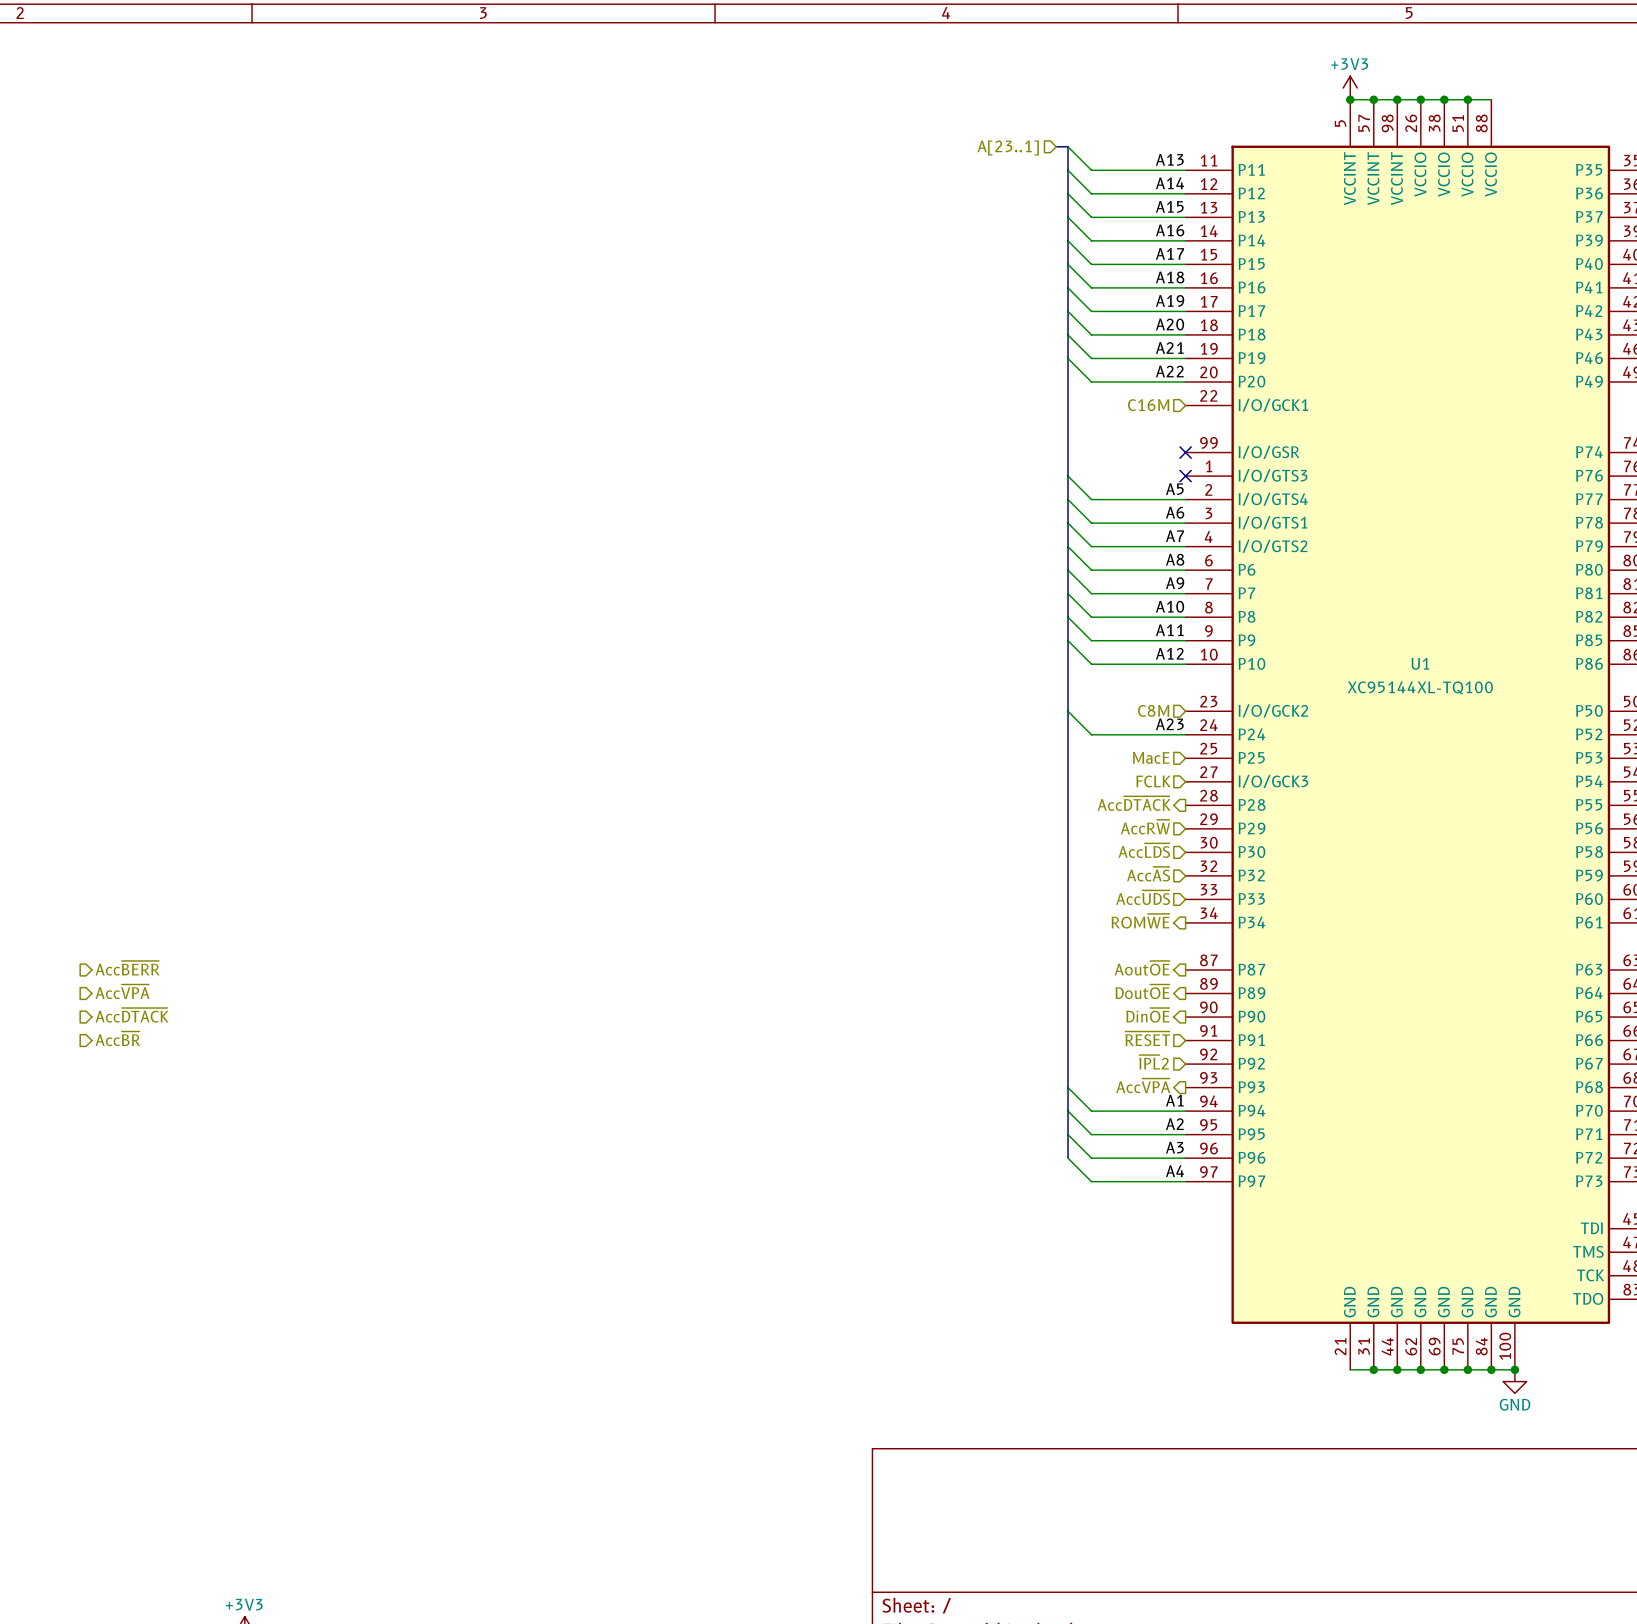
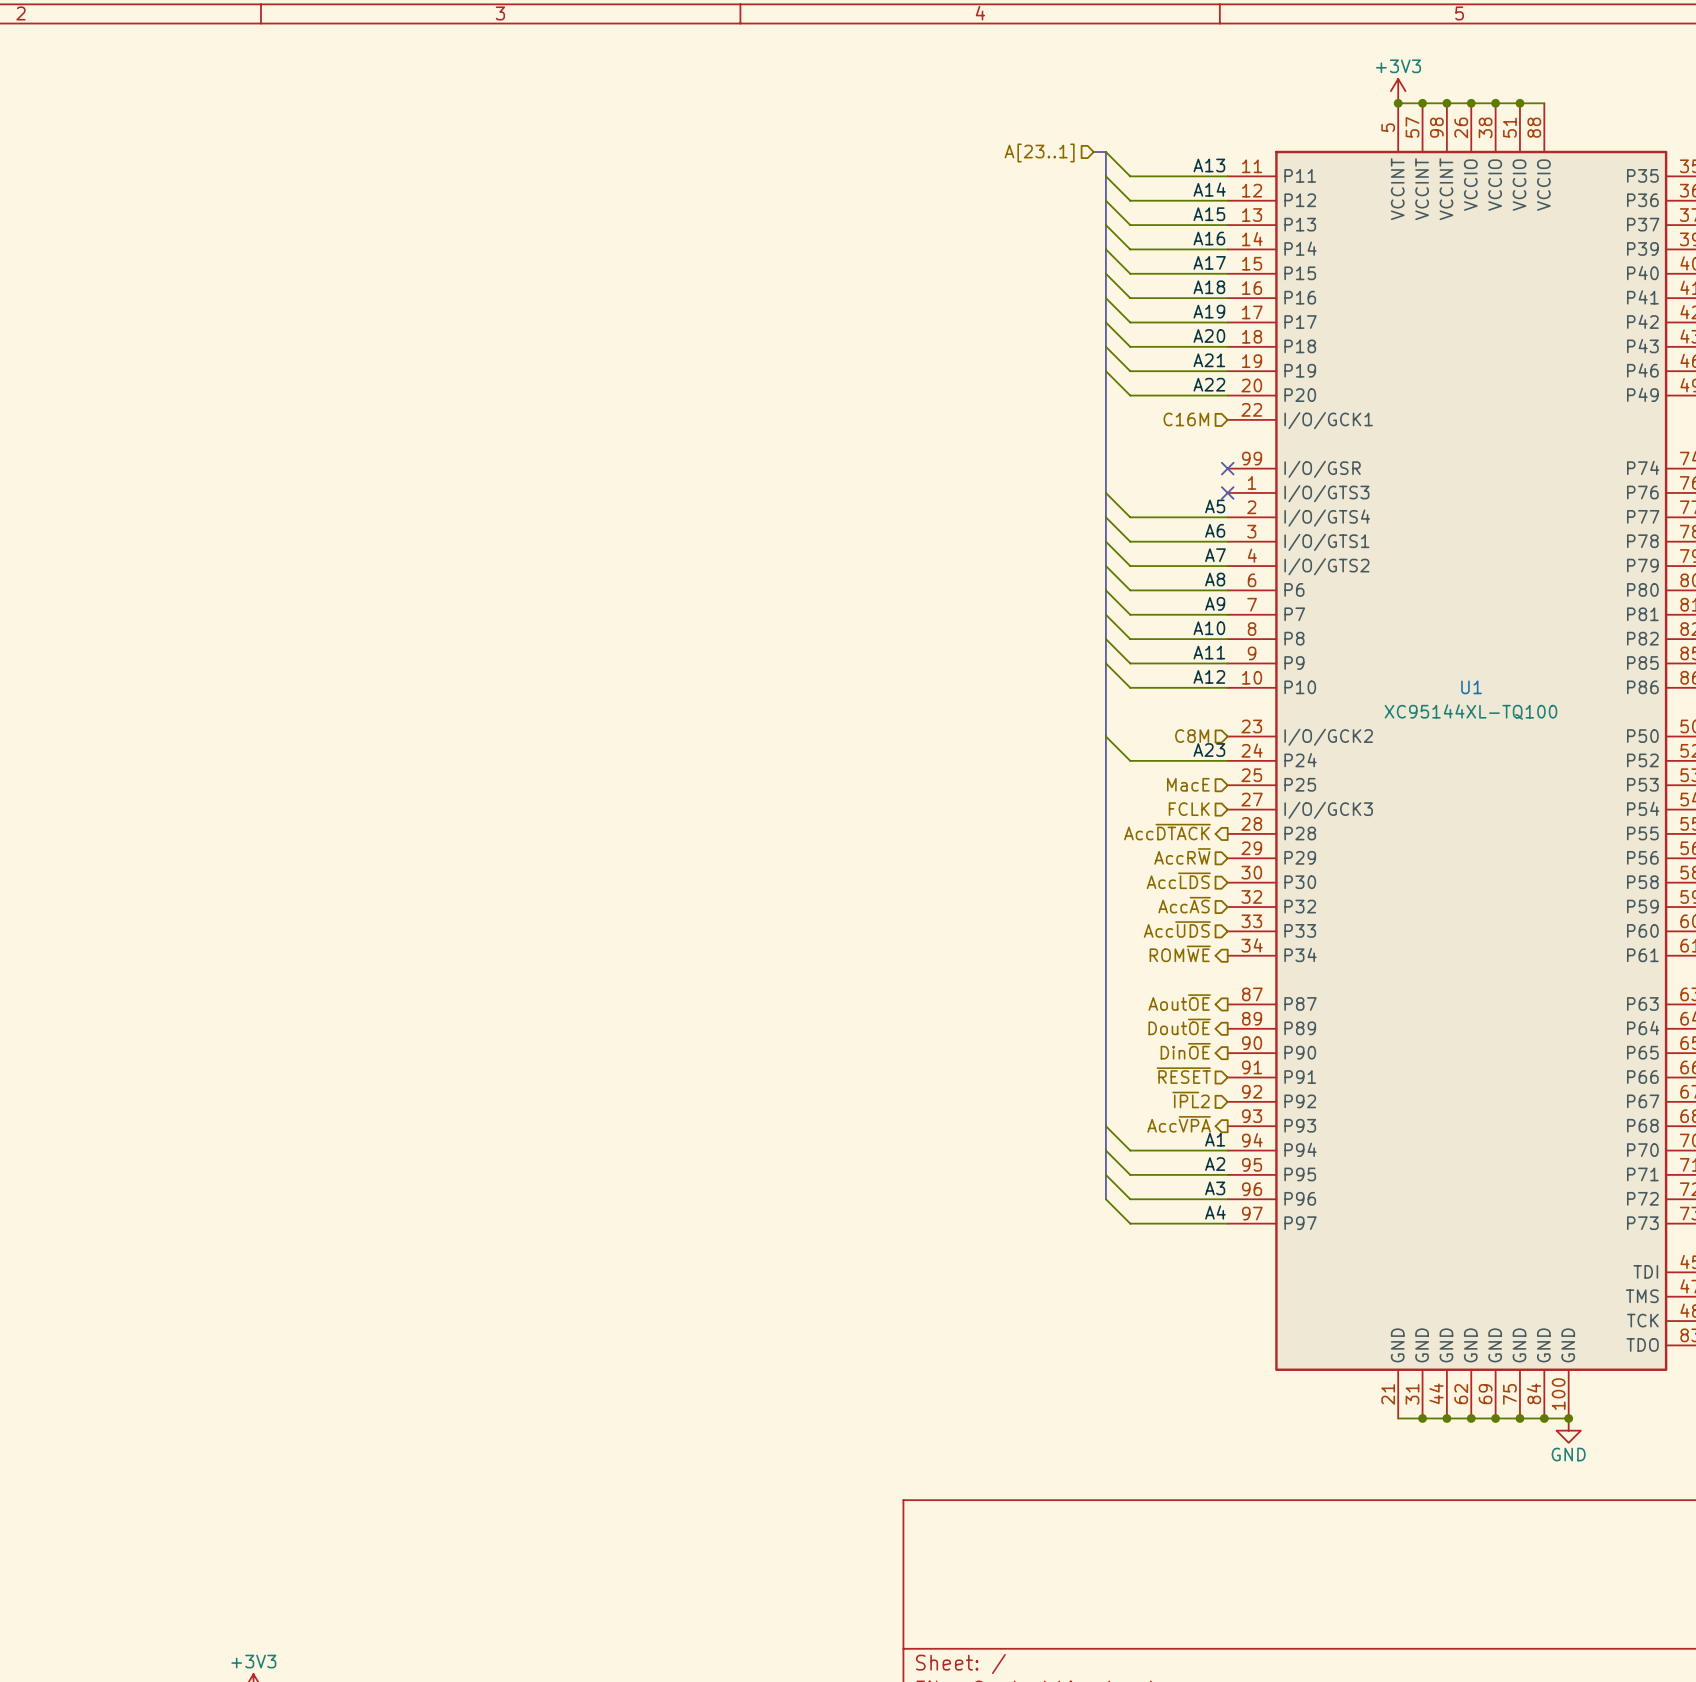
hierarchical label: Acc~{BERR} (127, 968) -> none
hierarchical label: Acc~{VPA} (122, 991) -> none
hierarchical label: Acc~{DTACK} (132, 1015) -> none
hierarchical label: Acc~{BR} (117, 1038) -> none

